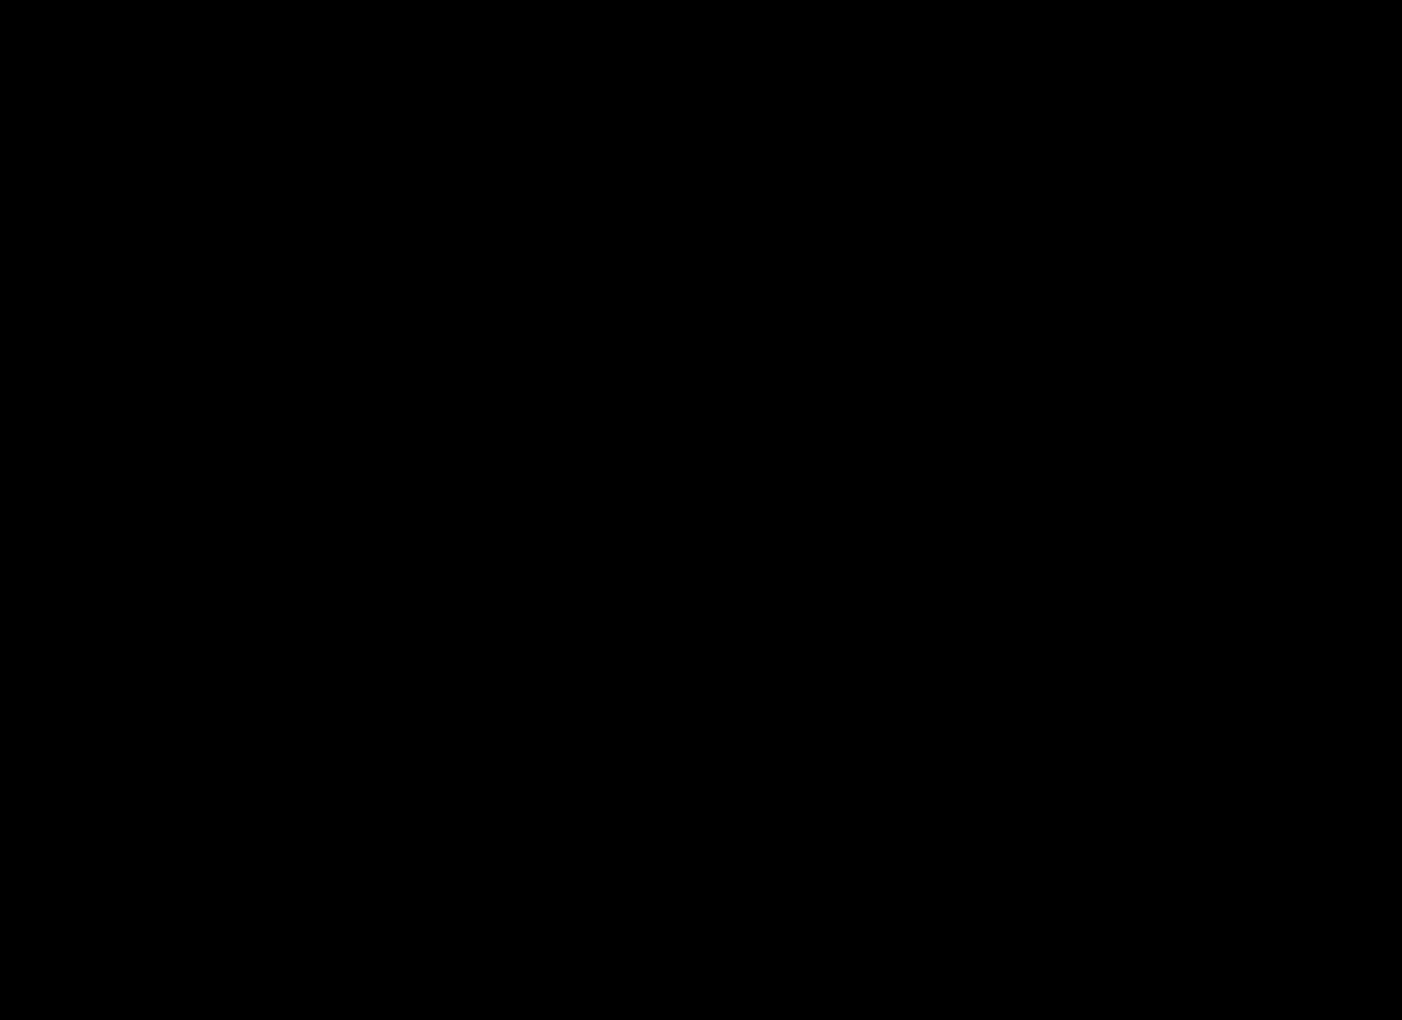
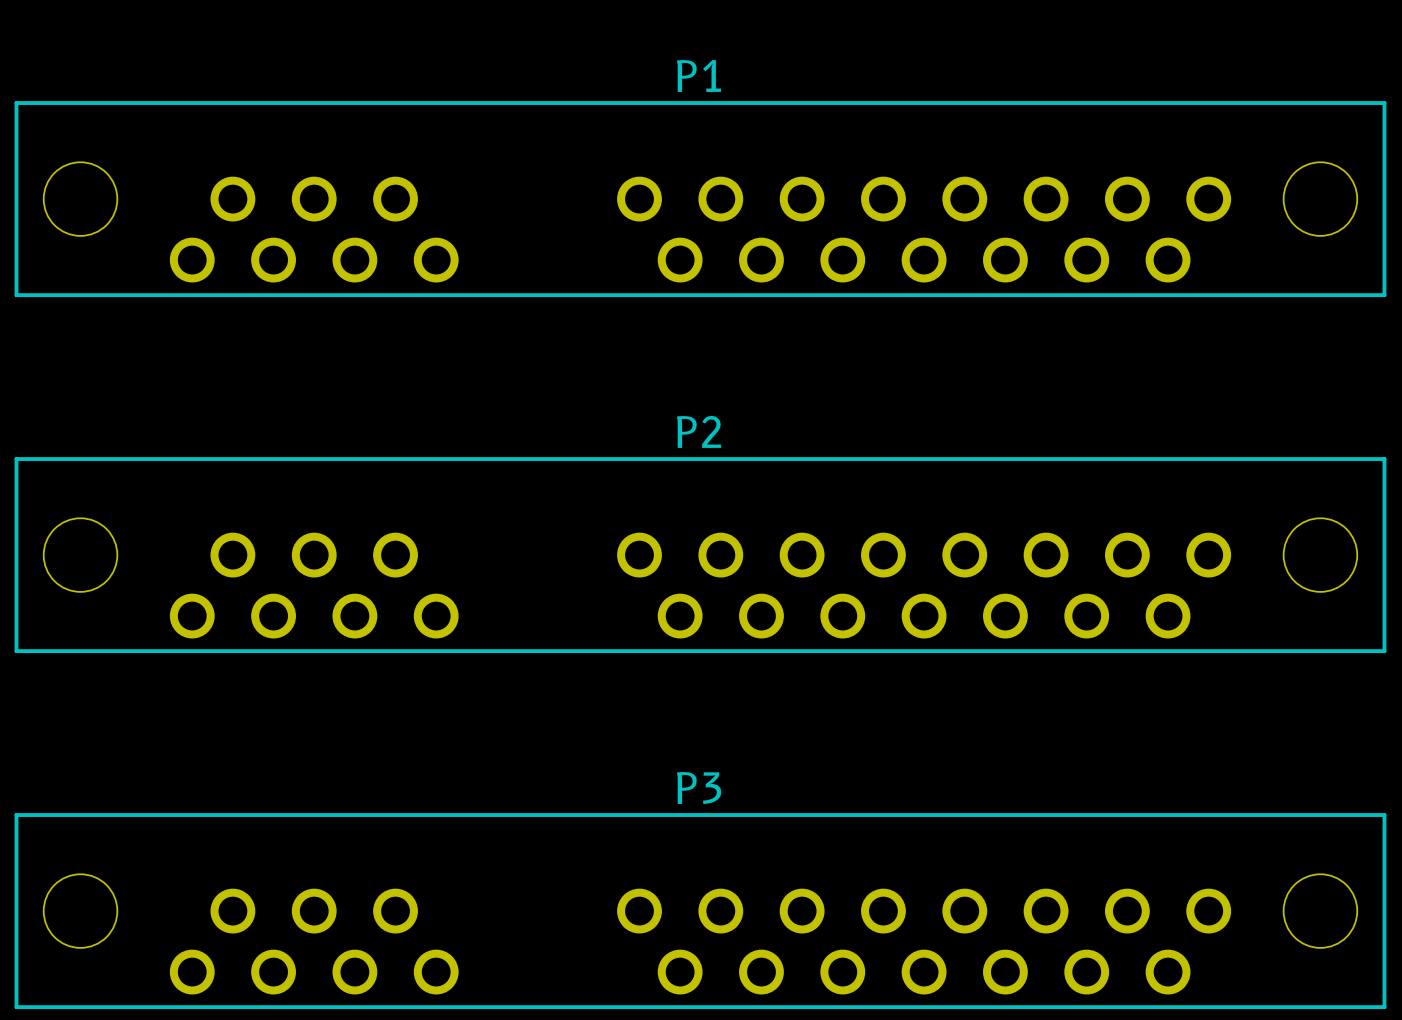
P1: none -> (700, 199)
P2: none -> (700, 555)
P3: none -> (700, 911)

